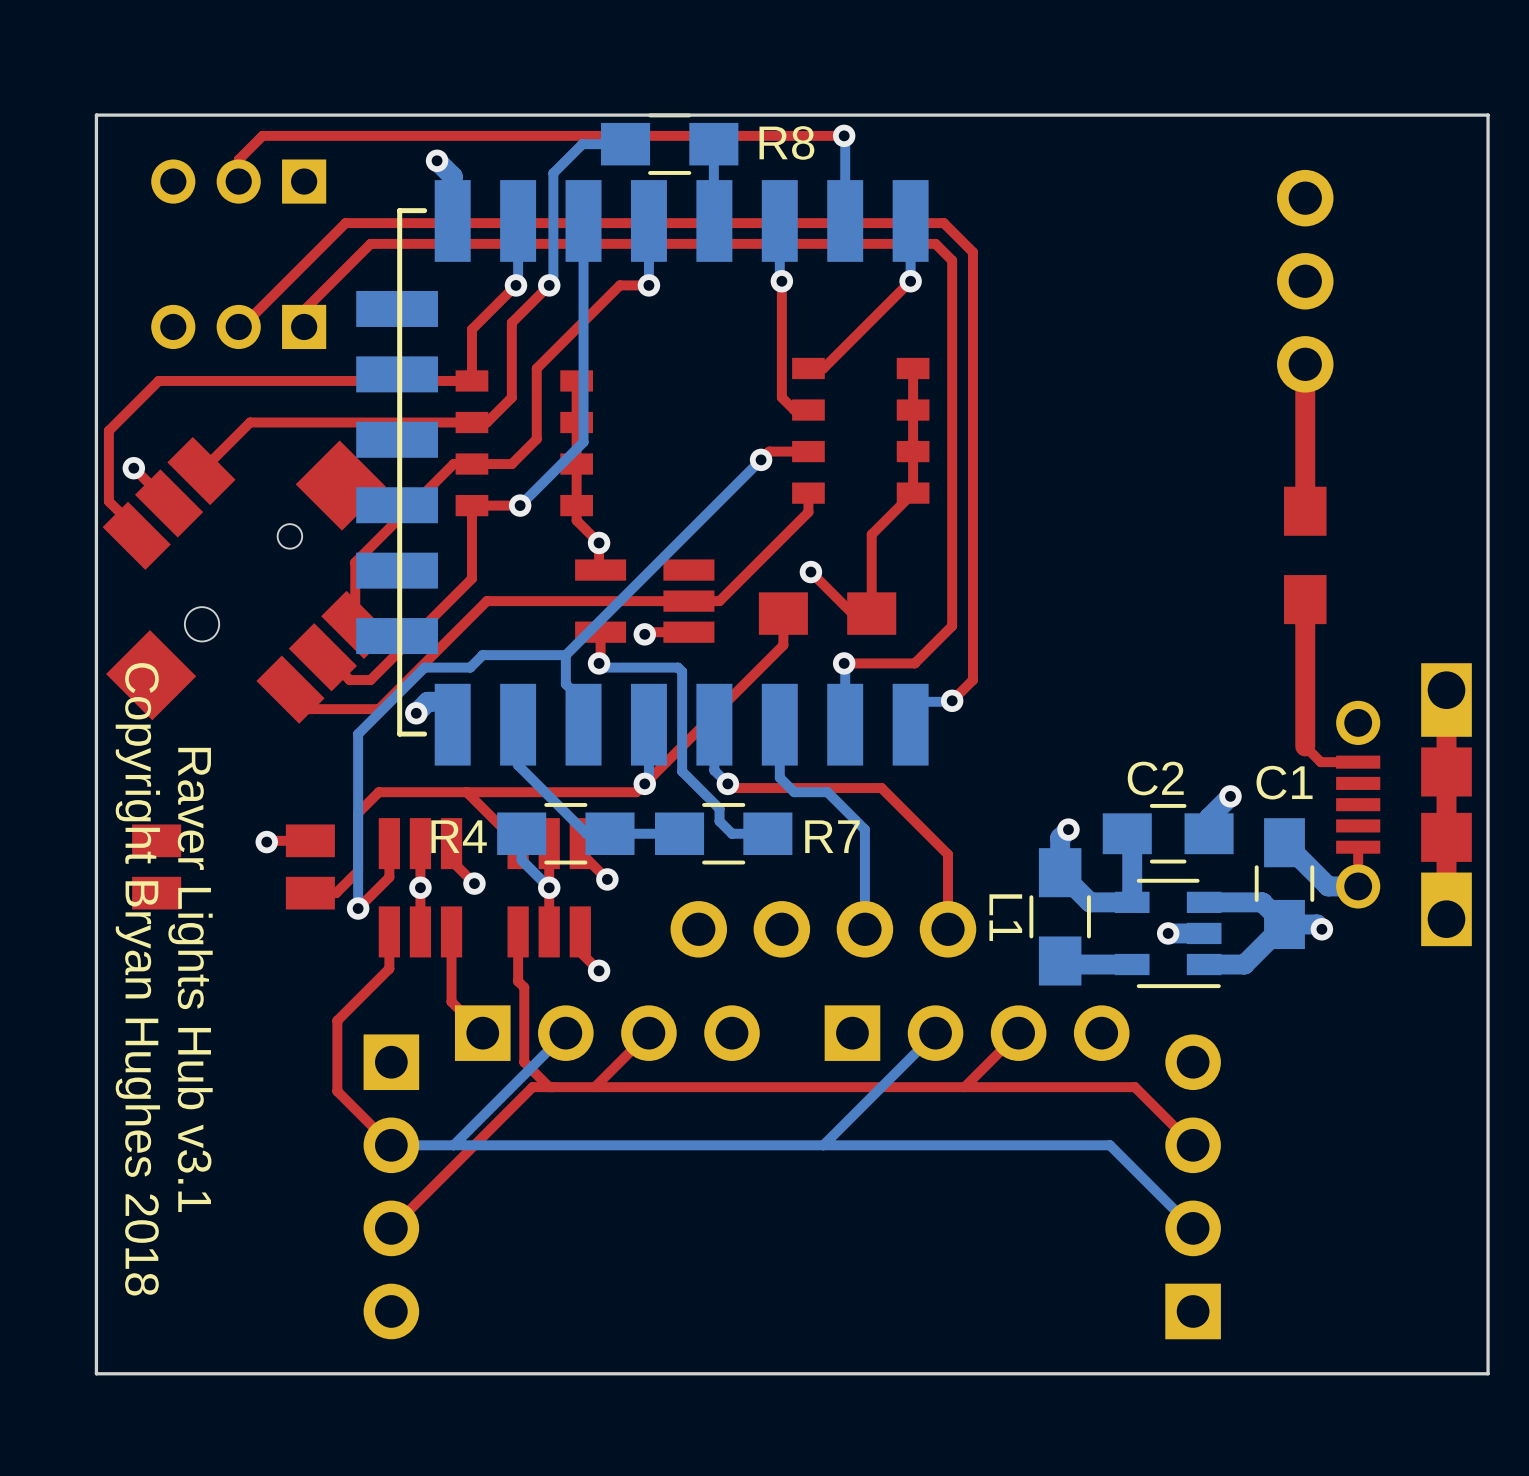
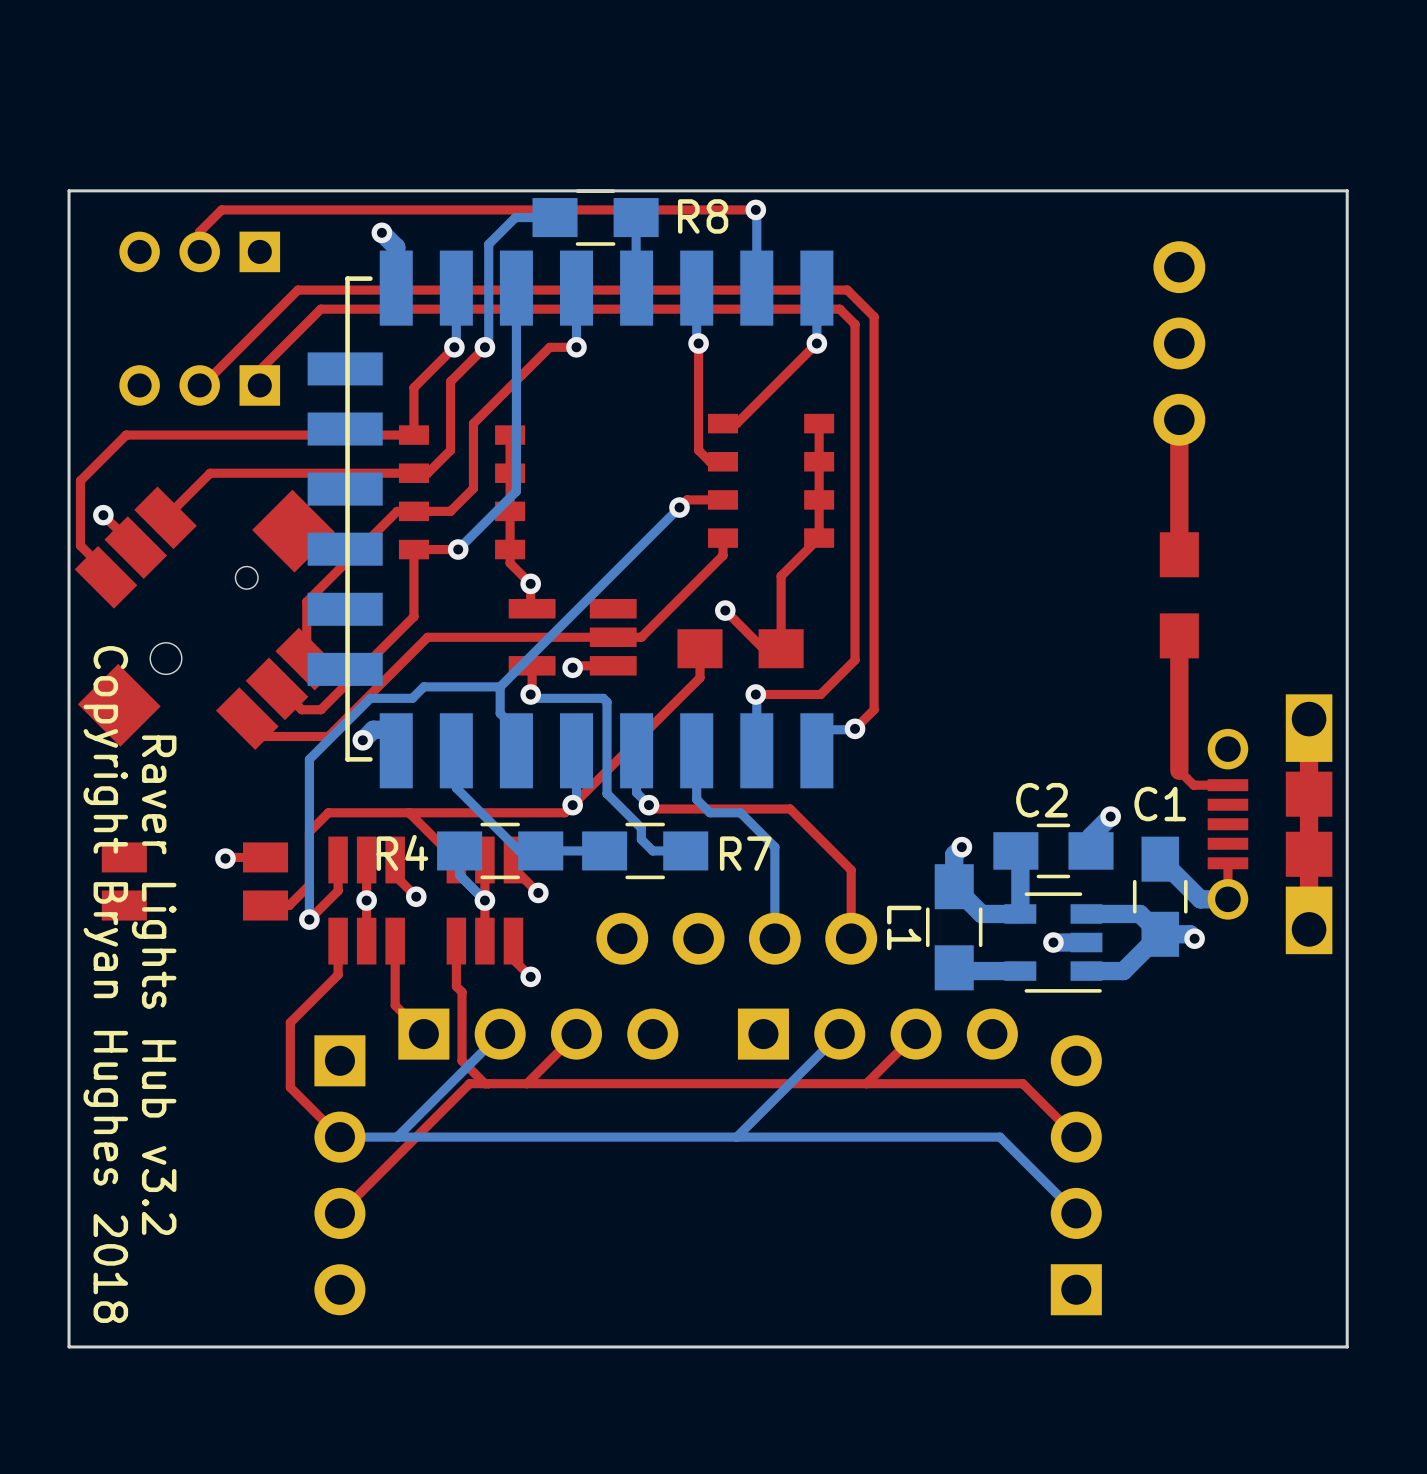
text: Raver Lights Hub v3.1 (190, 979) -> Raver Lights Hub v3.2 (154, 985)

